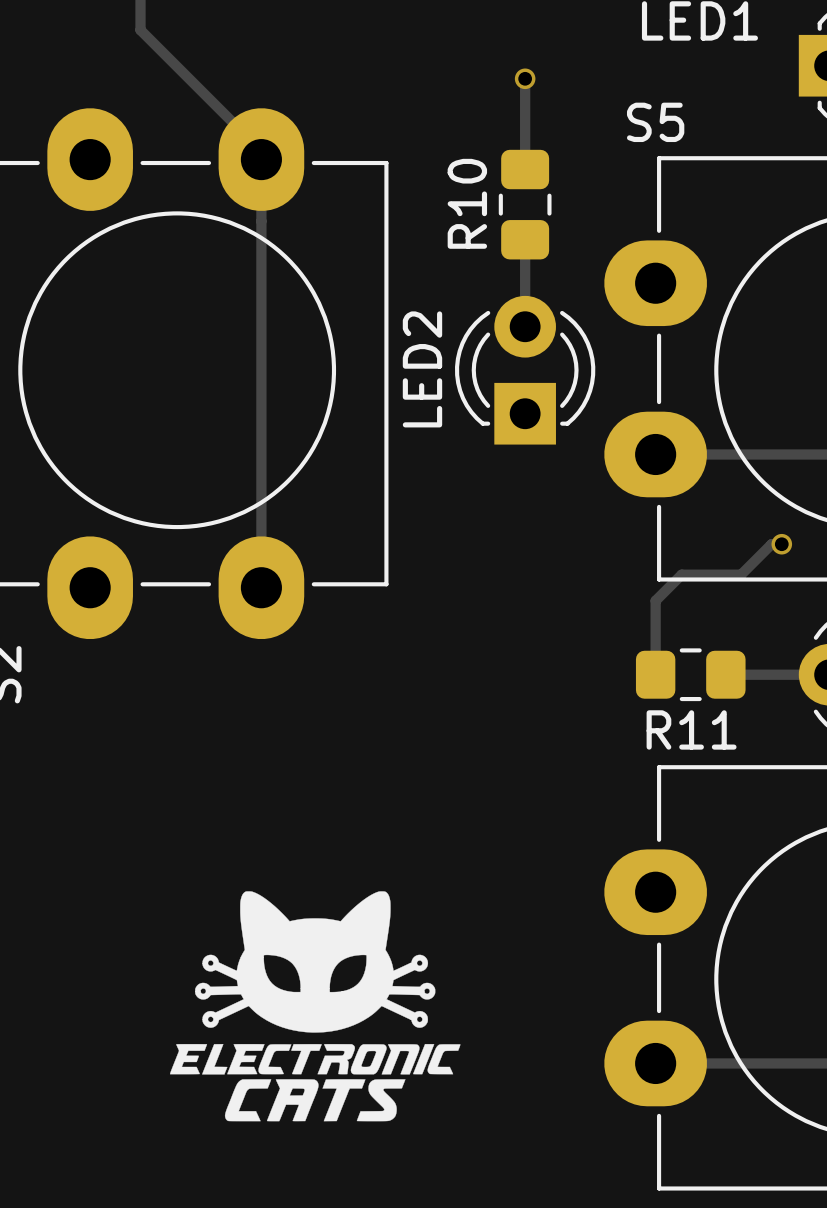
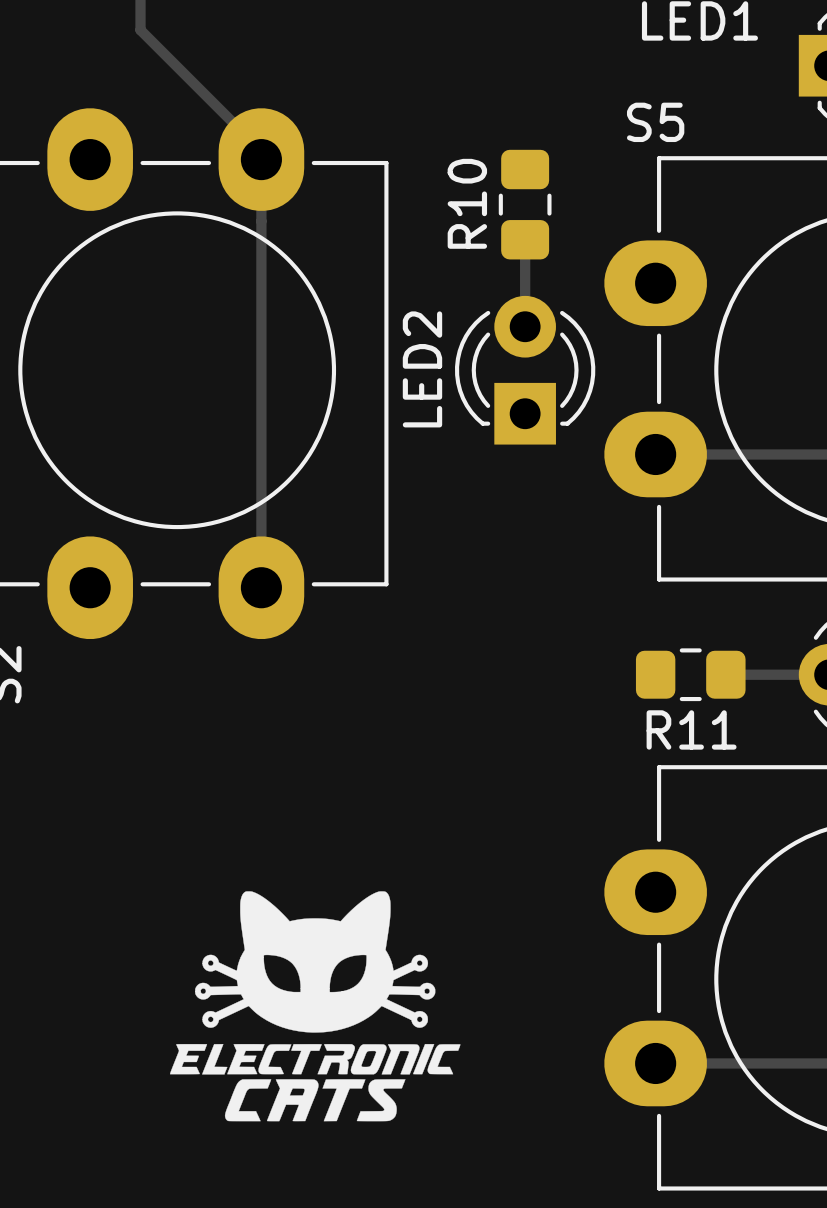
track: (525, 78) (525, 169) -> none
via: (525, 78) -> none
via: (781, 544) -> none
track: (786, 544) (771, 544) (741, 574) (681, 574) (655, 600) (655, 674) -> none

